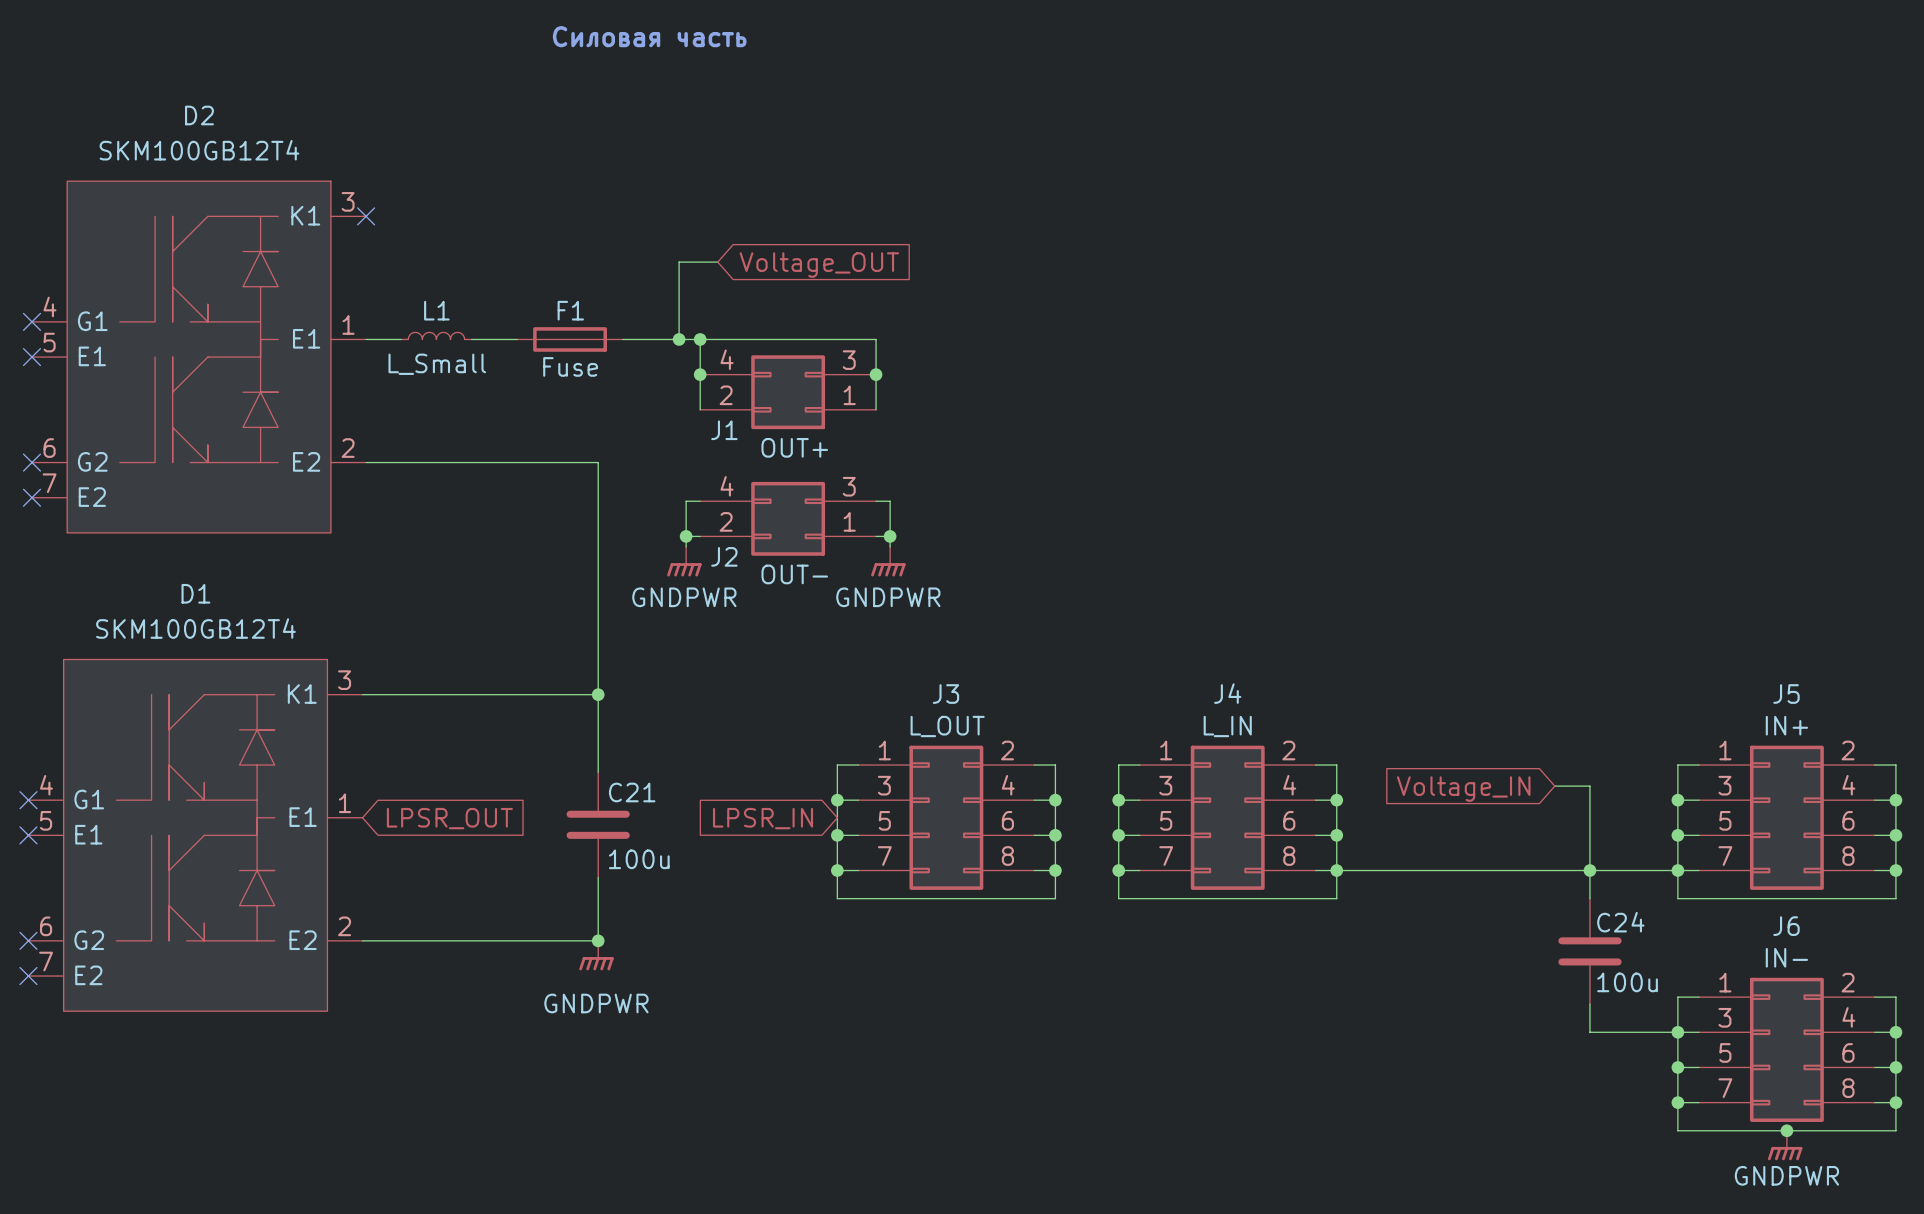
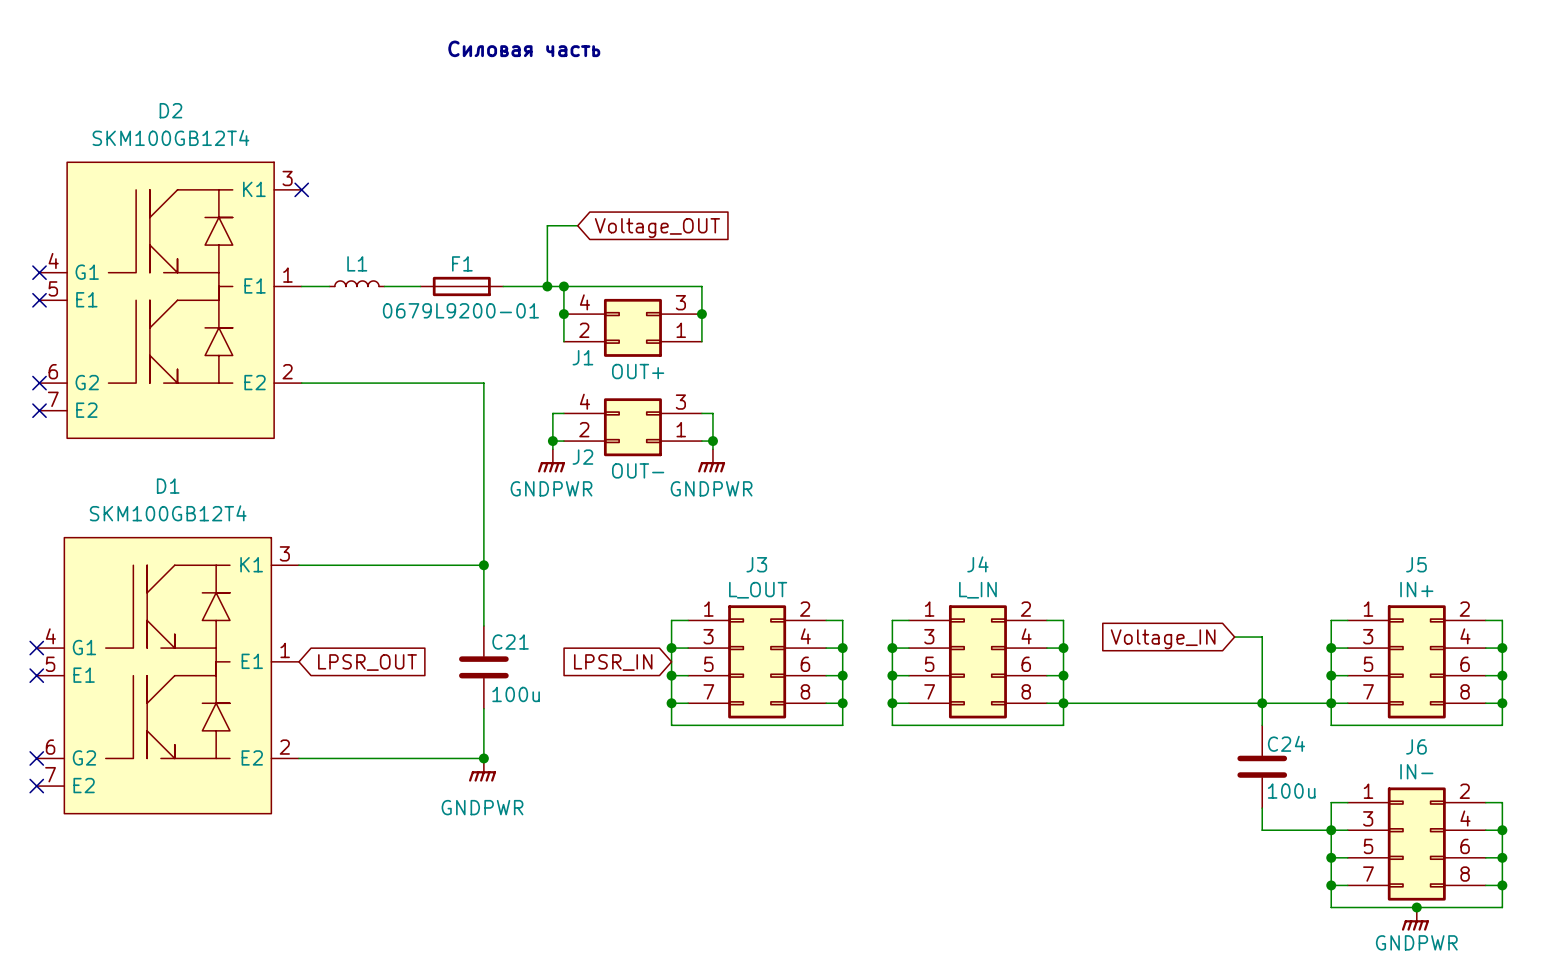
L1 value: L_Small (437, 364) -> none
F1 value: Fuse (570, 366) -> 0679L9200-01 (460, 310)

